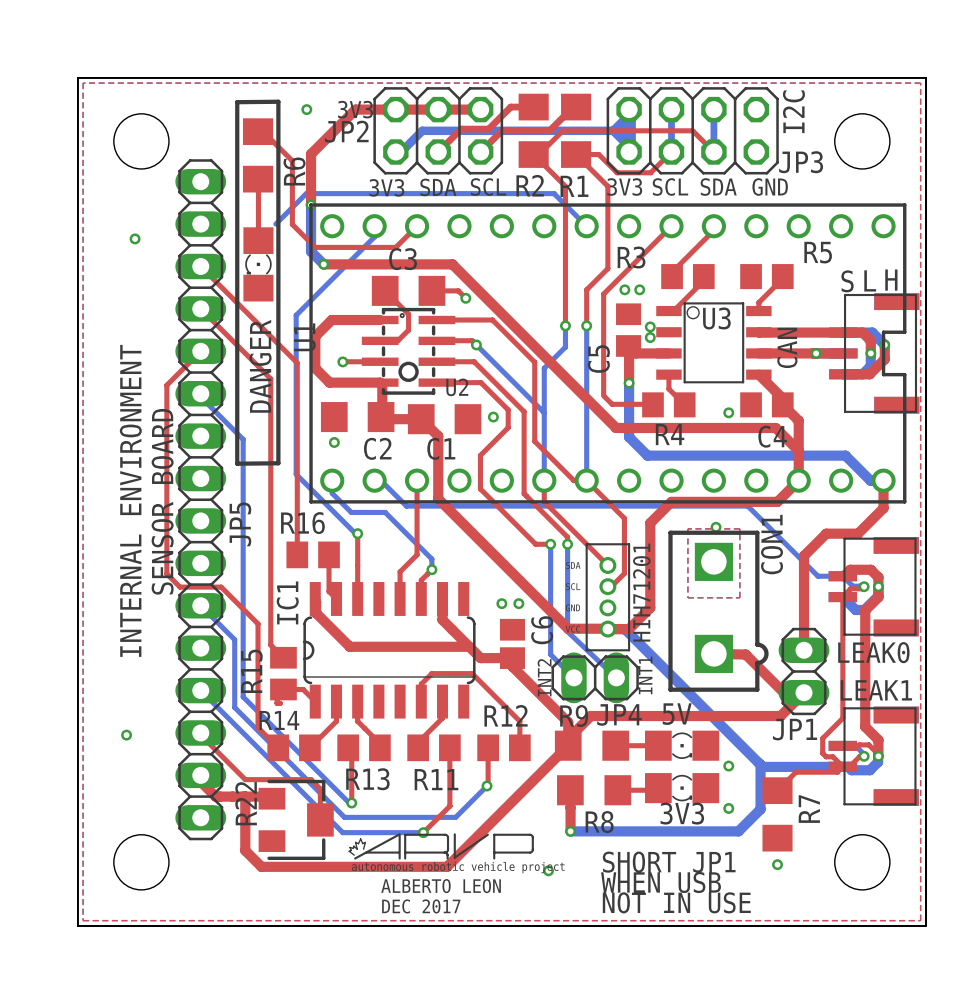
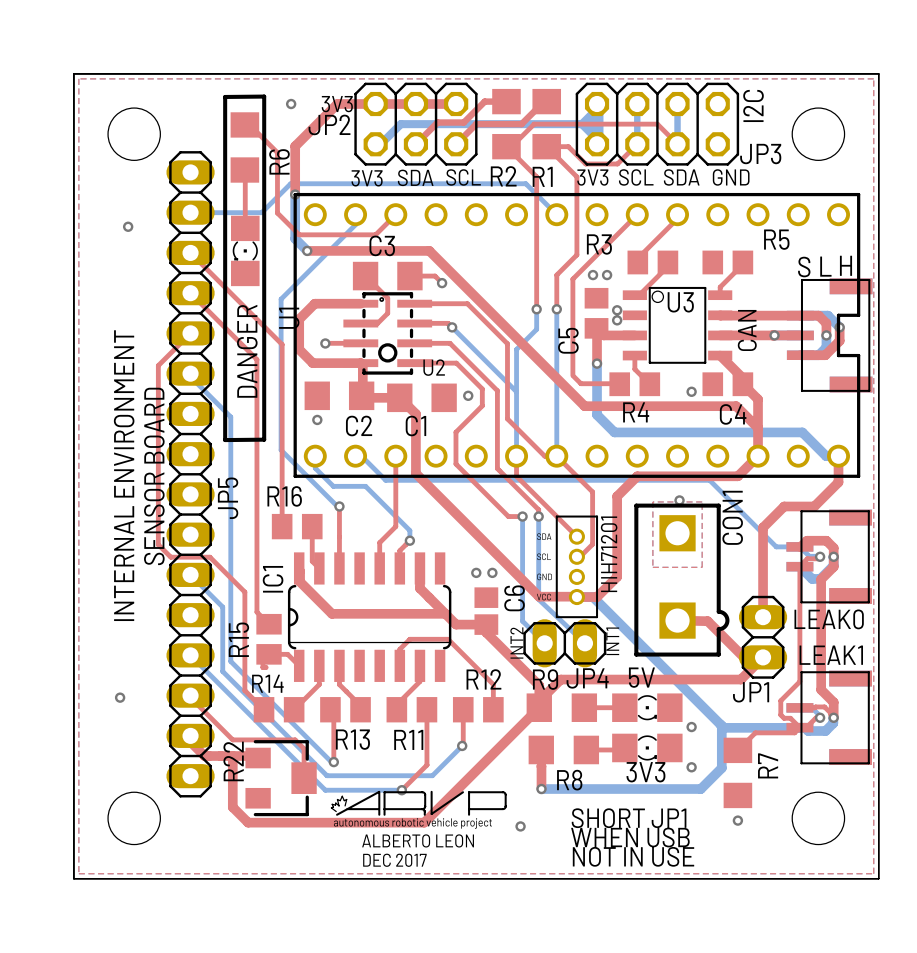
bottom track: none -> (190, 212) (261, 212)

